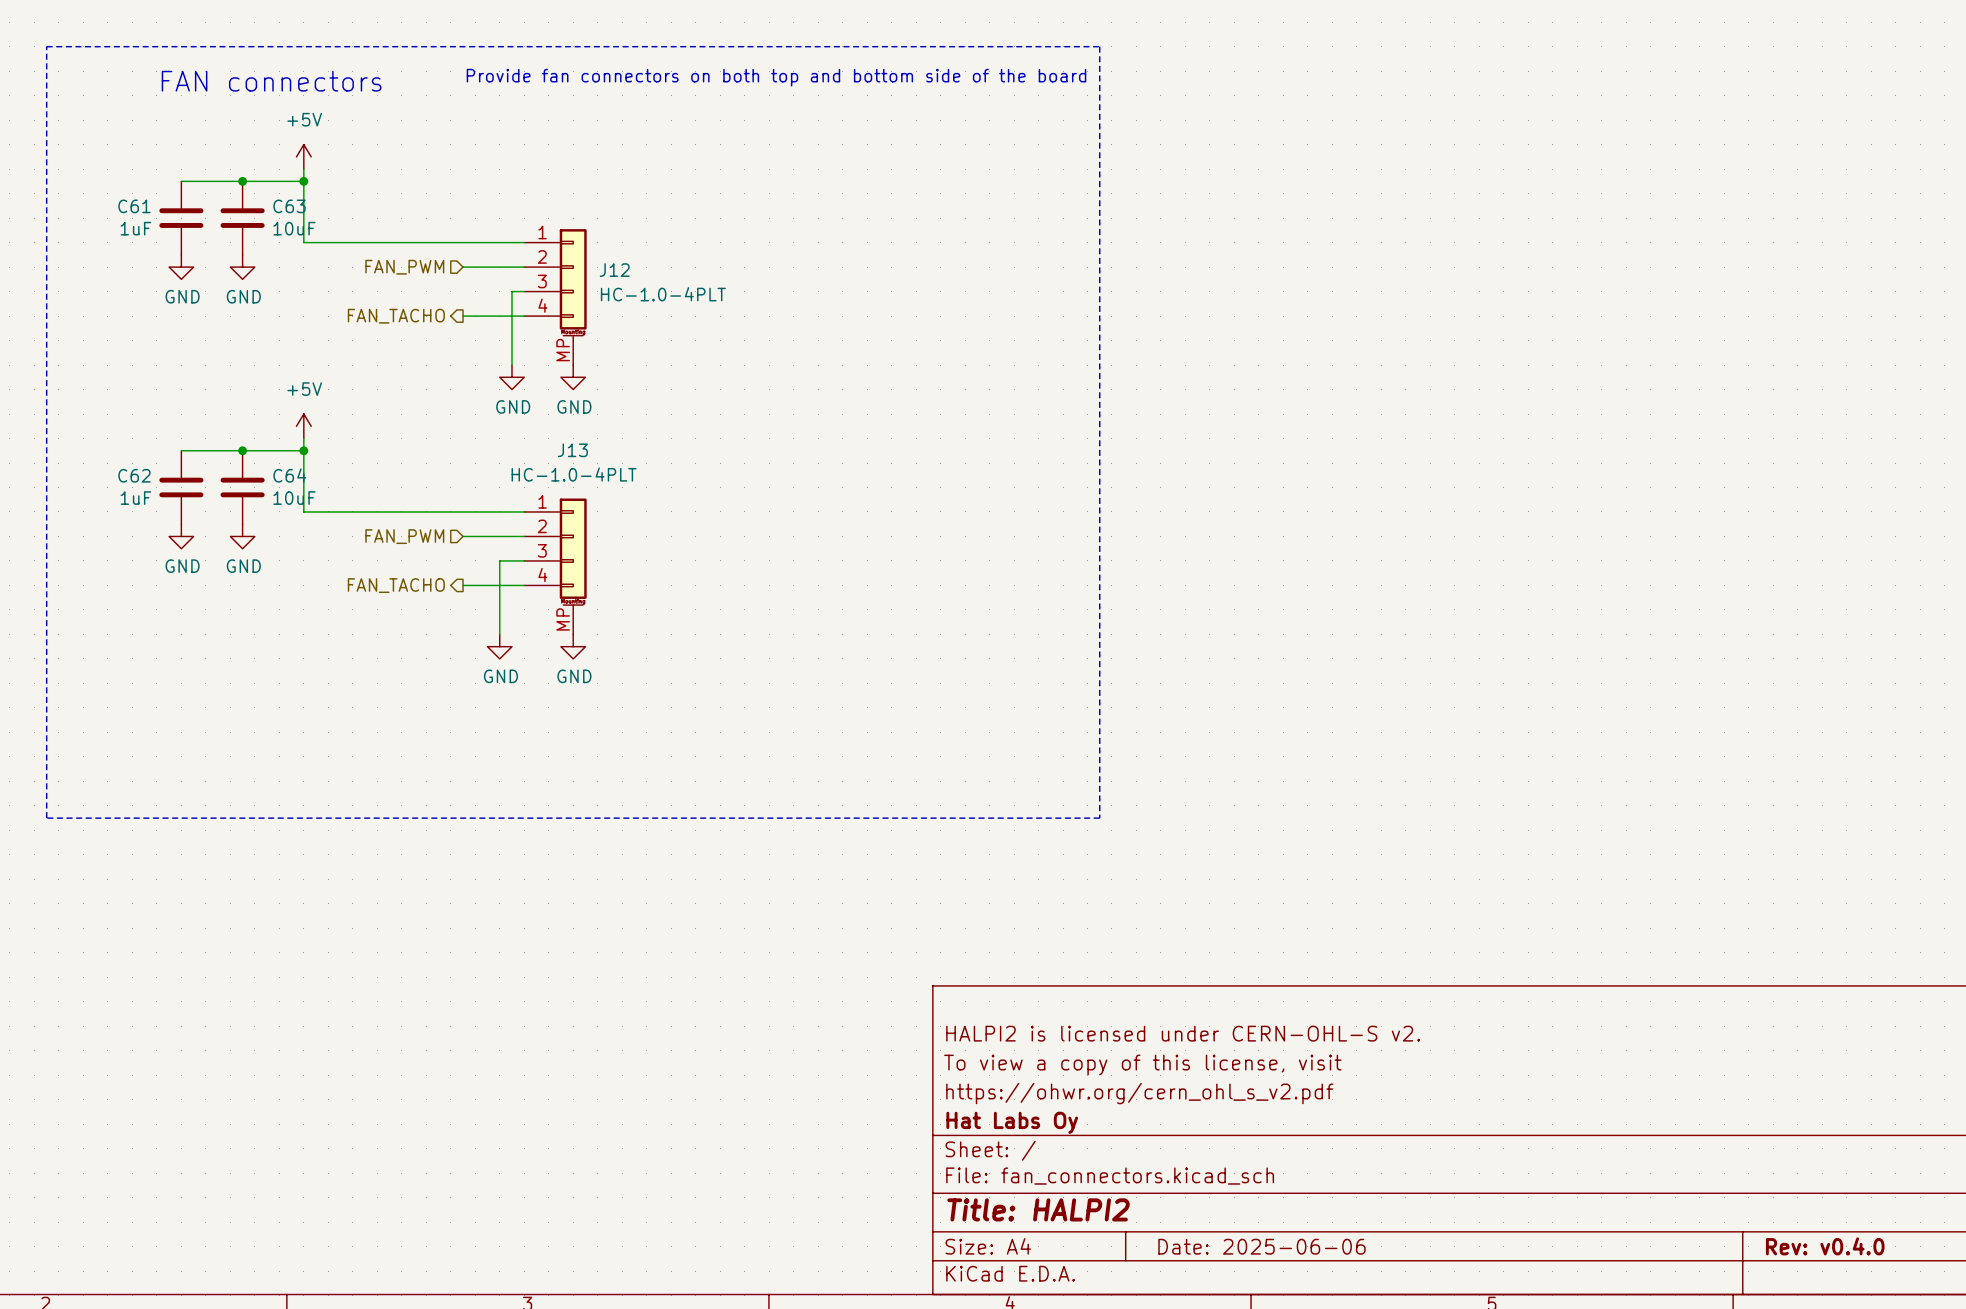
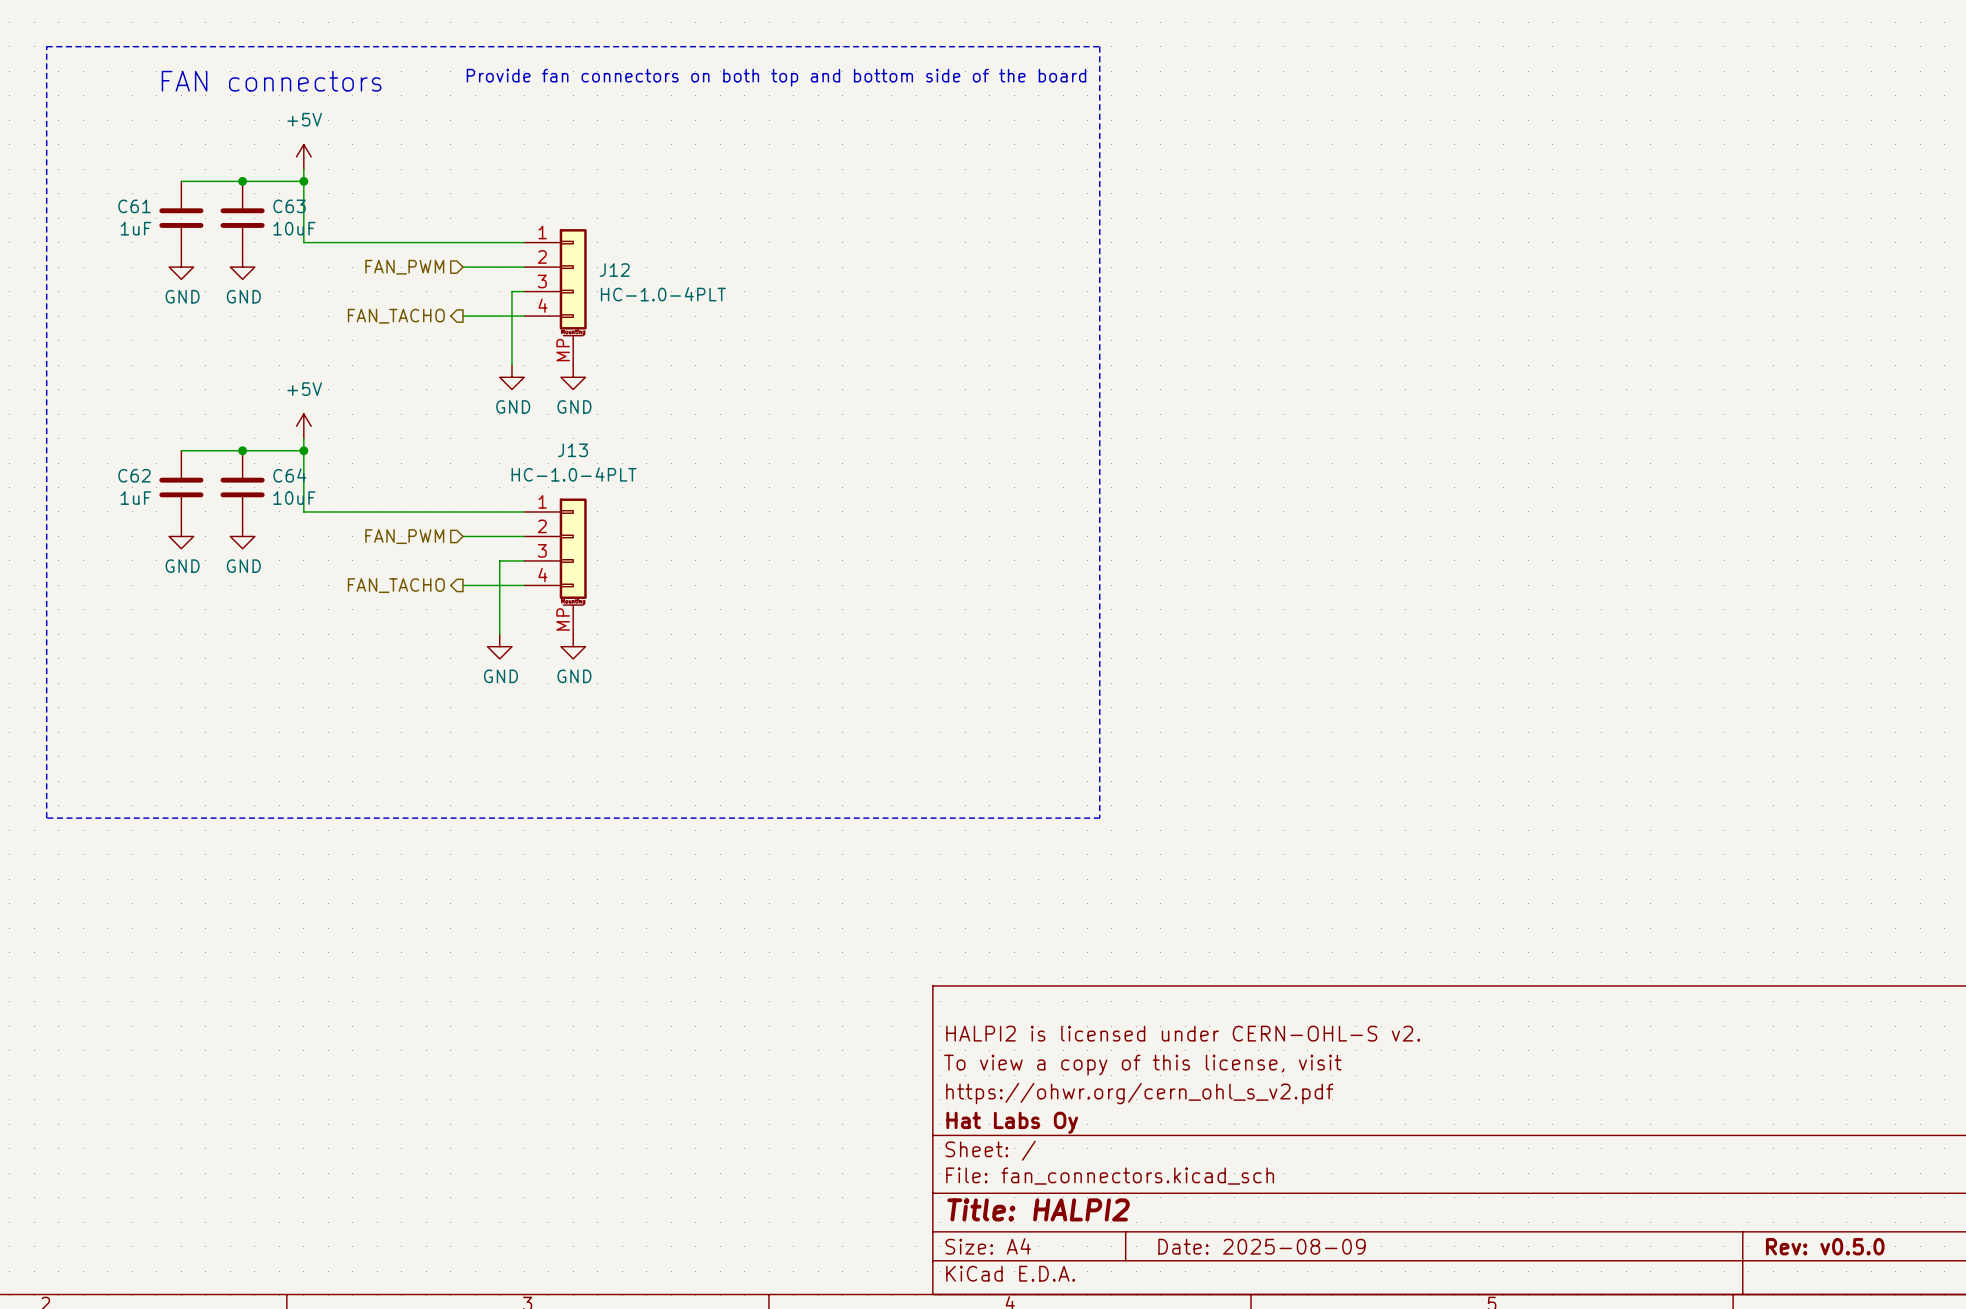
title block: Date: 2025-06-06 (1261, 1246) -> Date: 2025-08-09 (1261, 1246)
title block: Rev: v0.4.0 (1825, 1246) -> Rev: v0.5.0 (1825, 1246)

